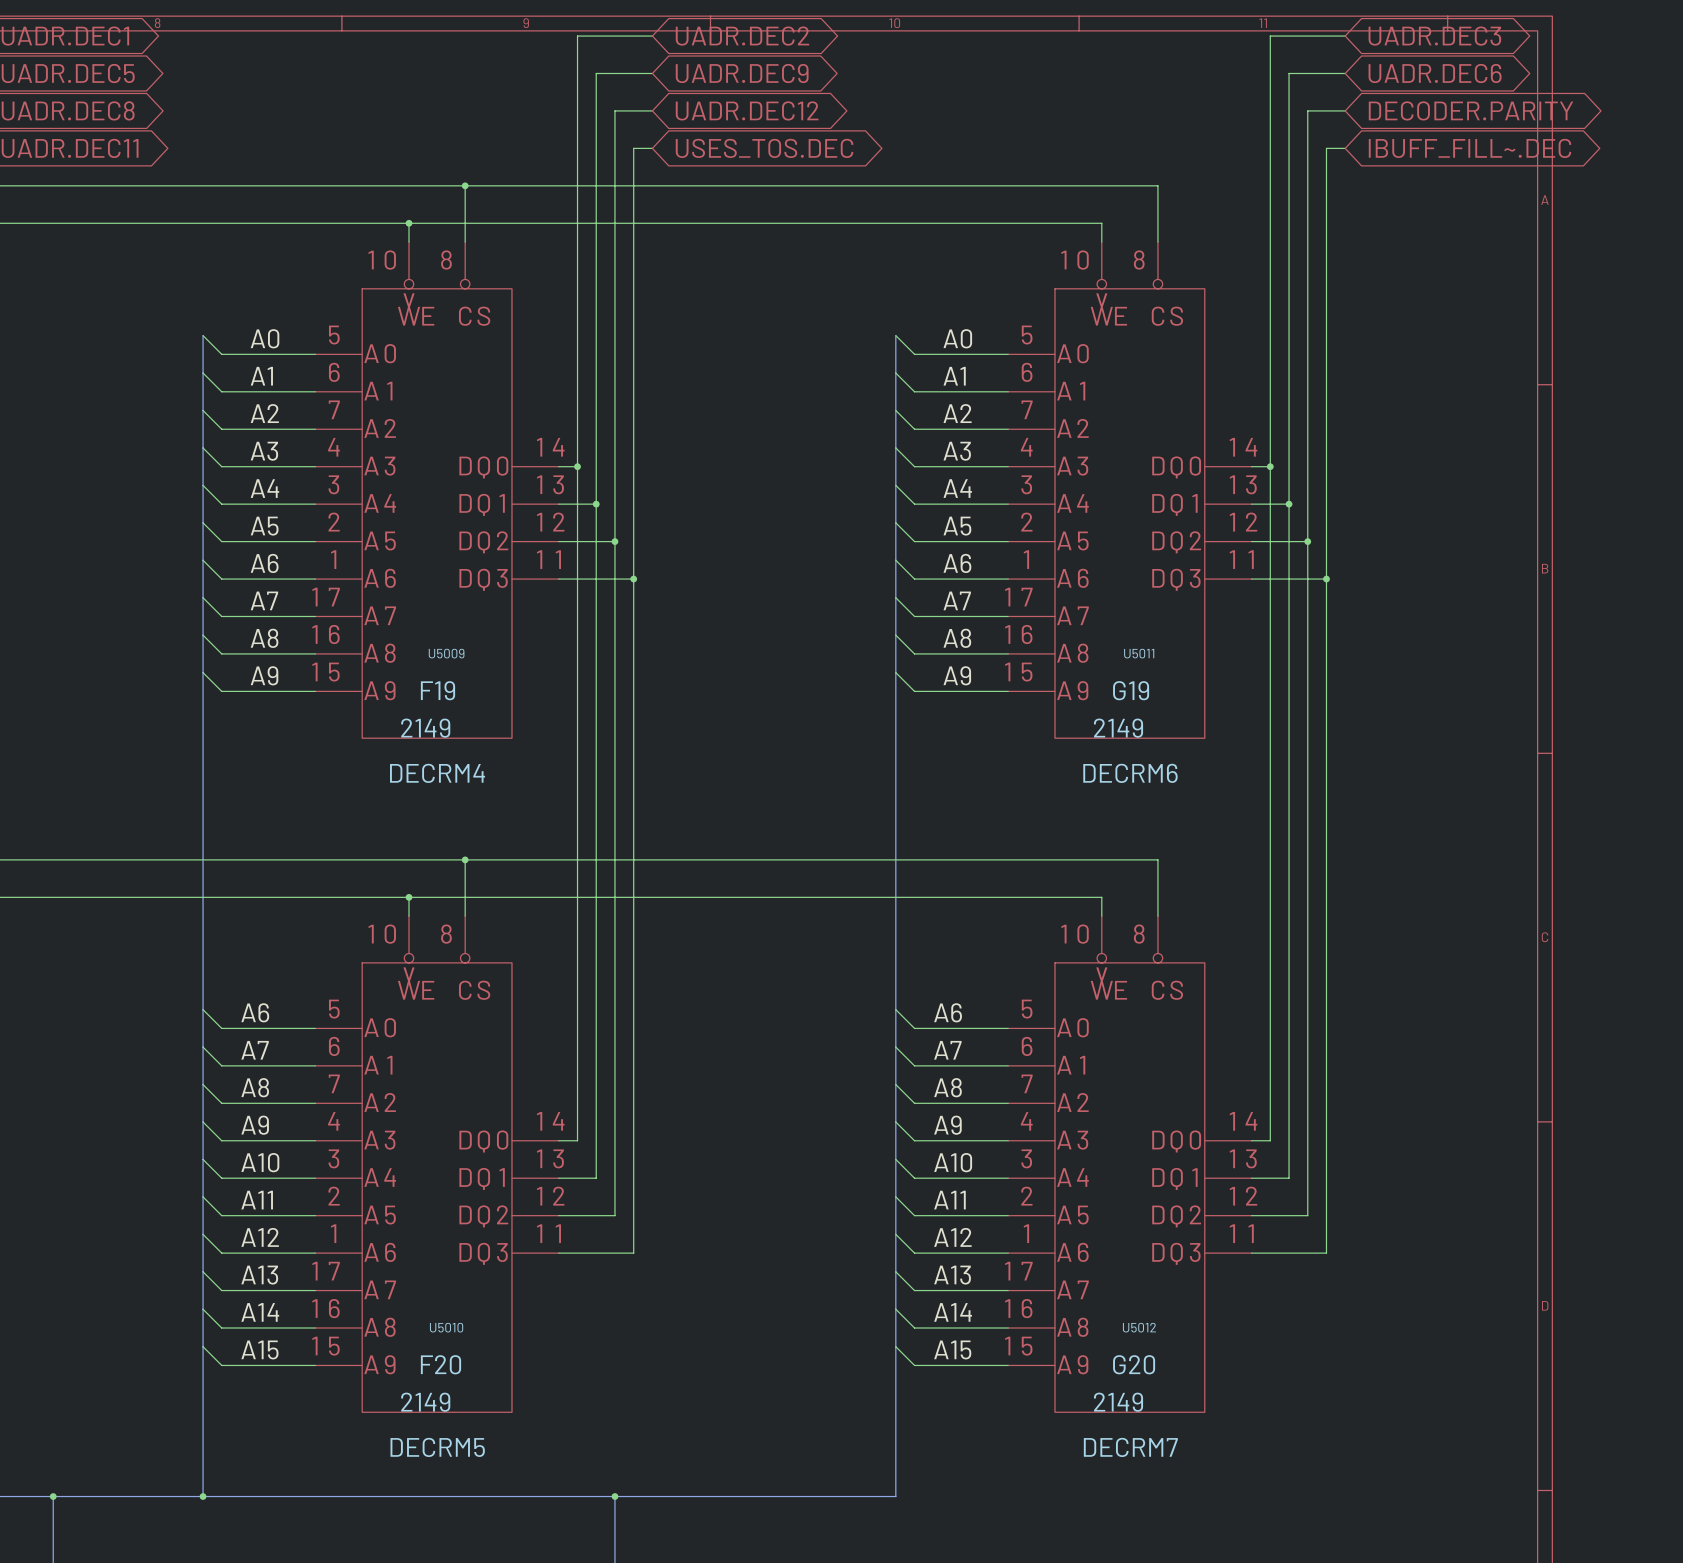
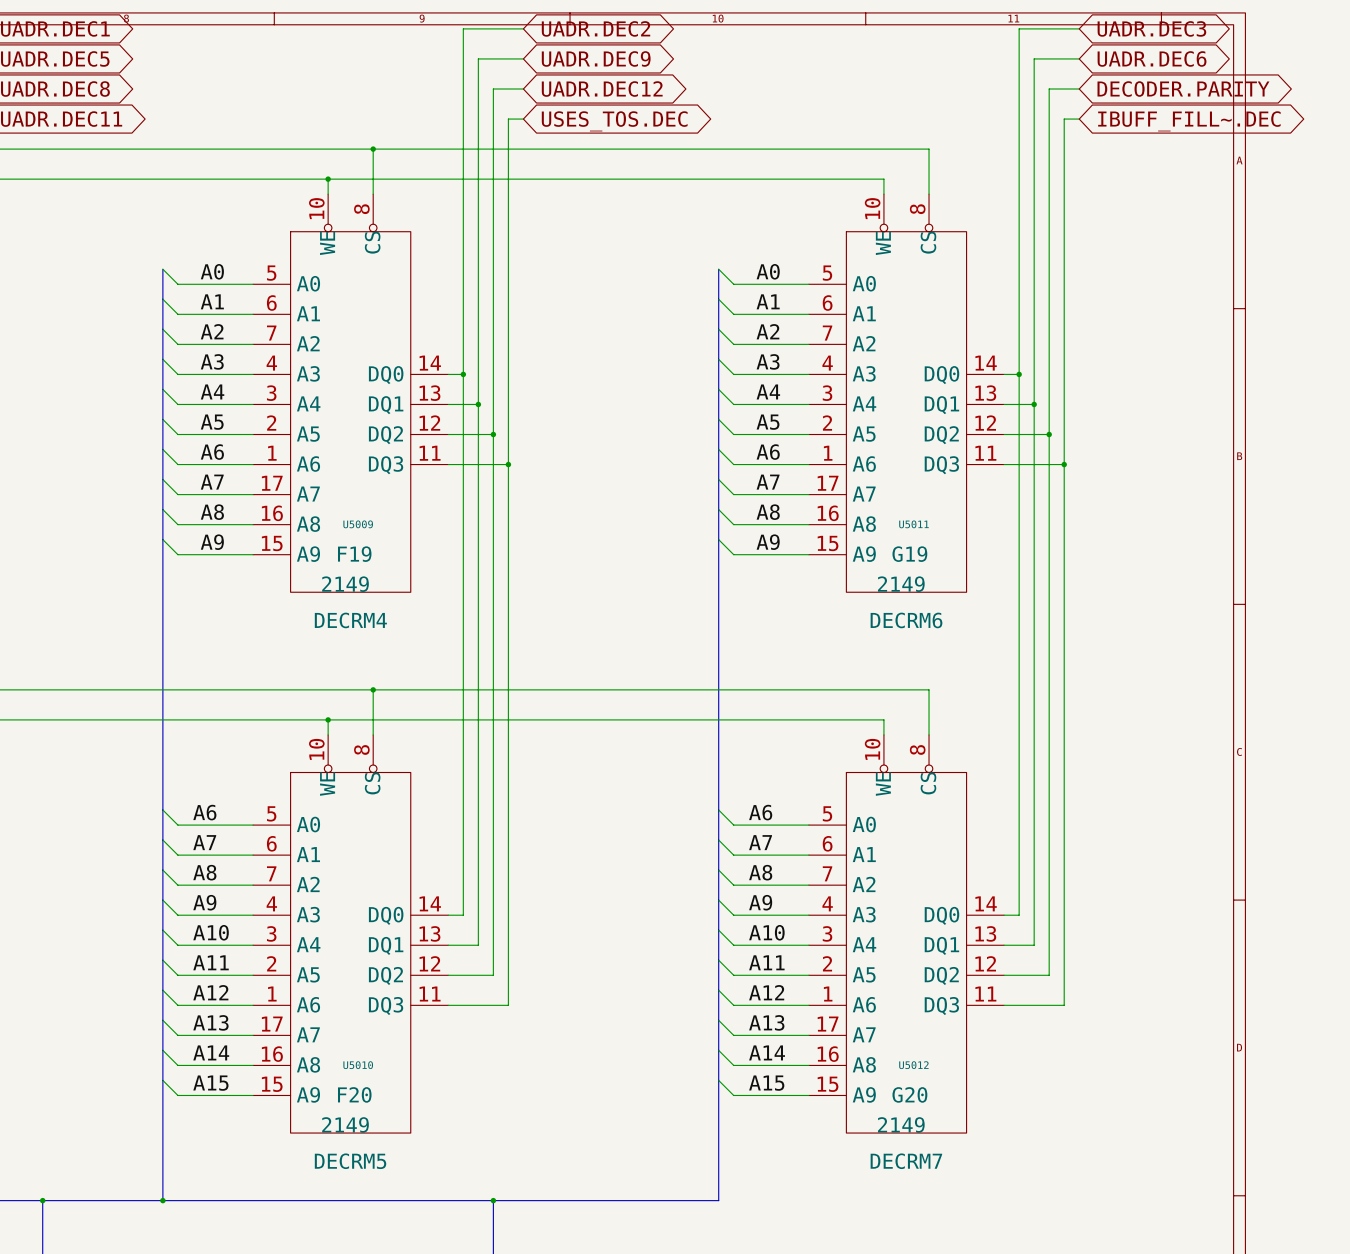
U5009 symbol: [315, 242, 559, 739] -> [253, 194, 449, 593]
U5011 symbol: [1008, 242, 1252, 739] -> [808, 194, 1005, 593]
U5010 symbol: [315, 916, 559, 1413] -> [253, 734, 449, 1134]
U5012 symbol: [1008, 916, 1252, 1413] -> [808, 734, 1005, 1134]

